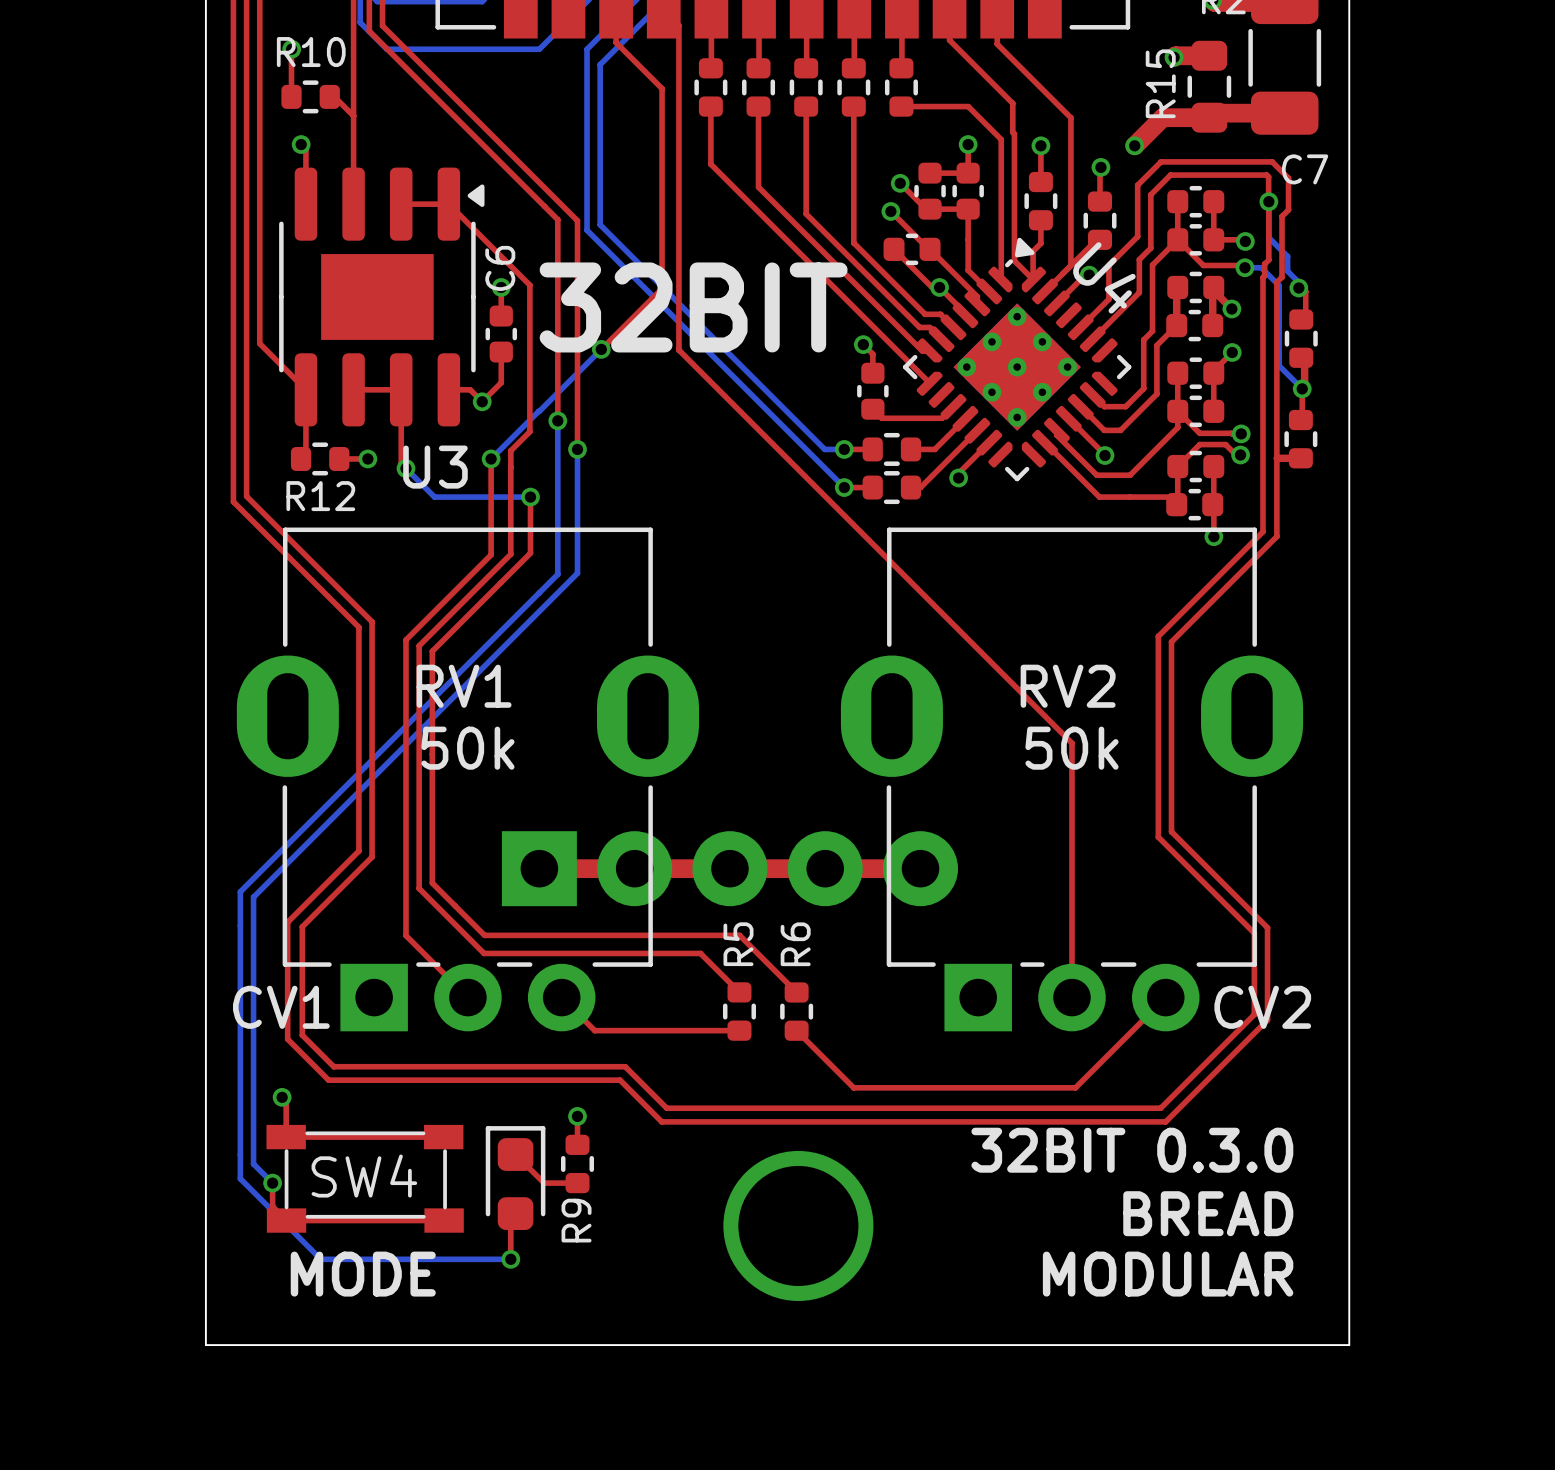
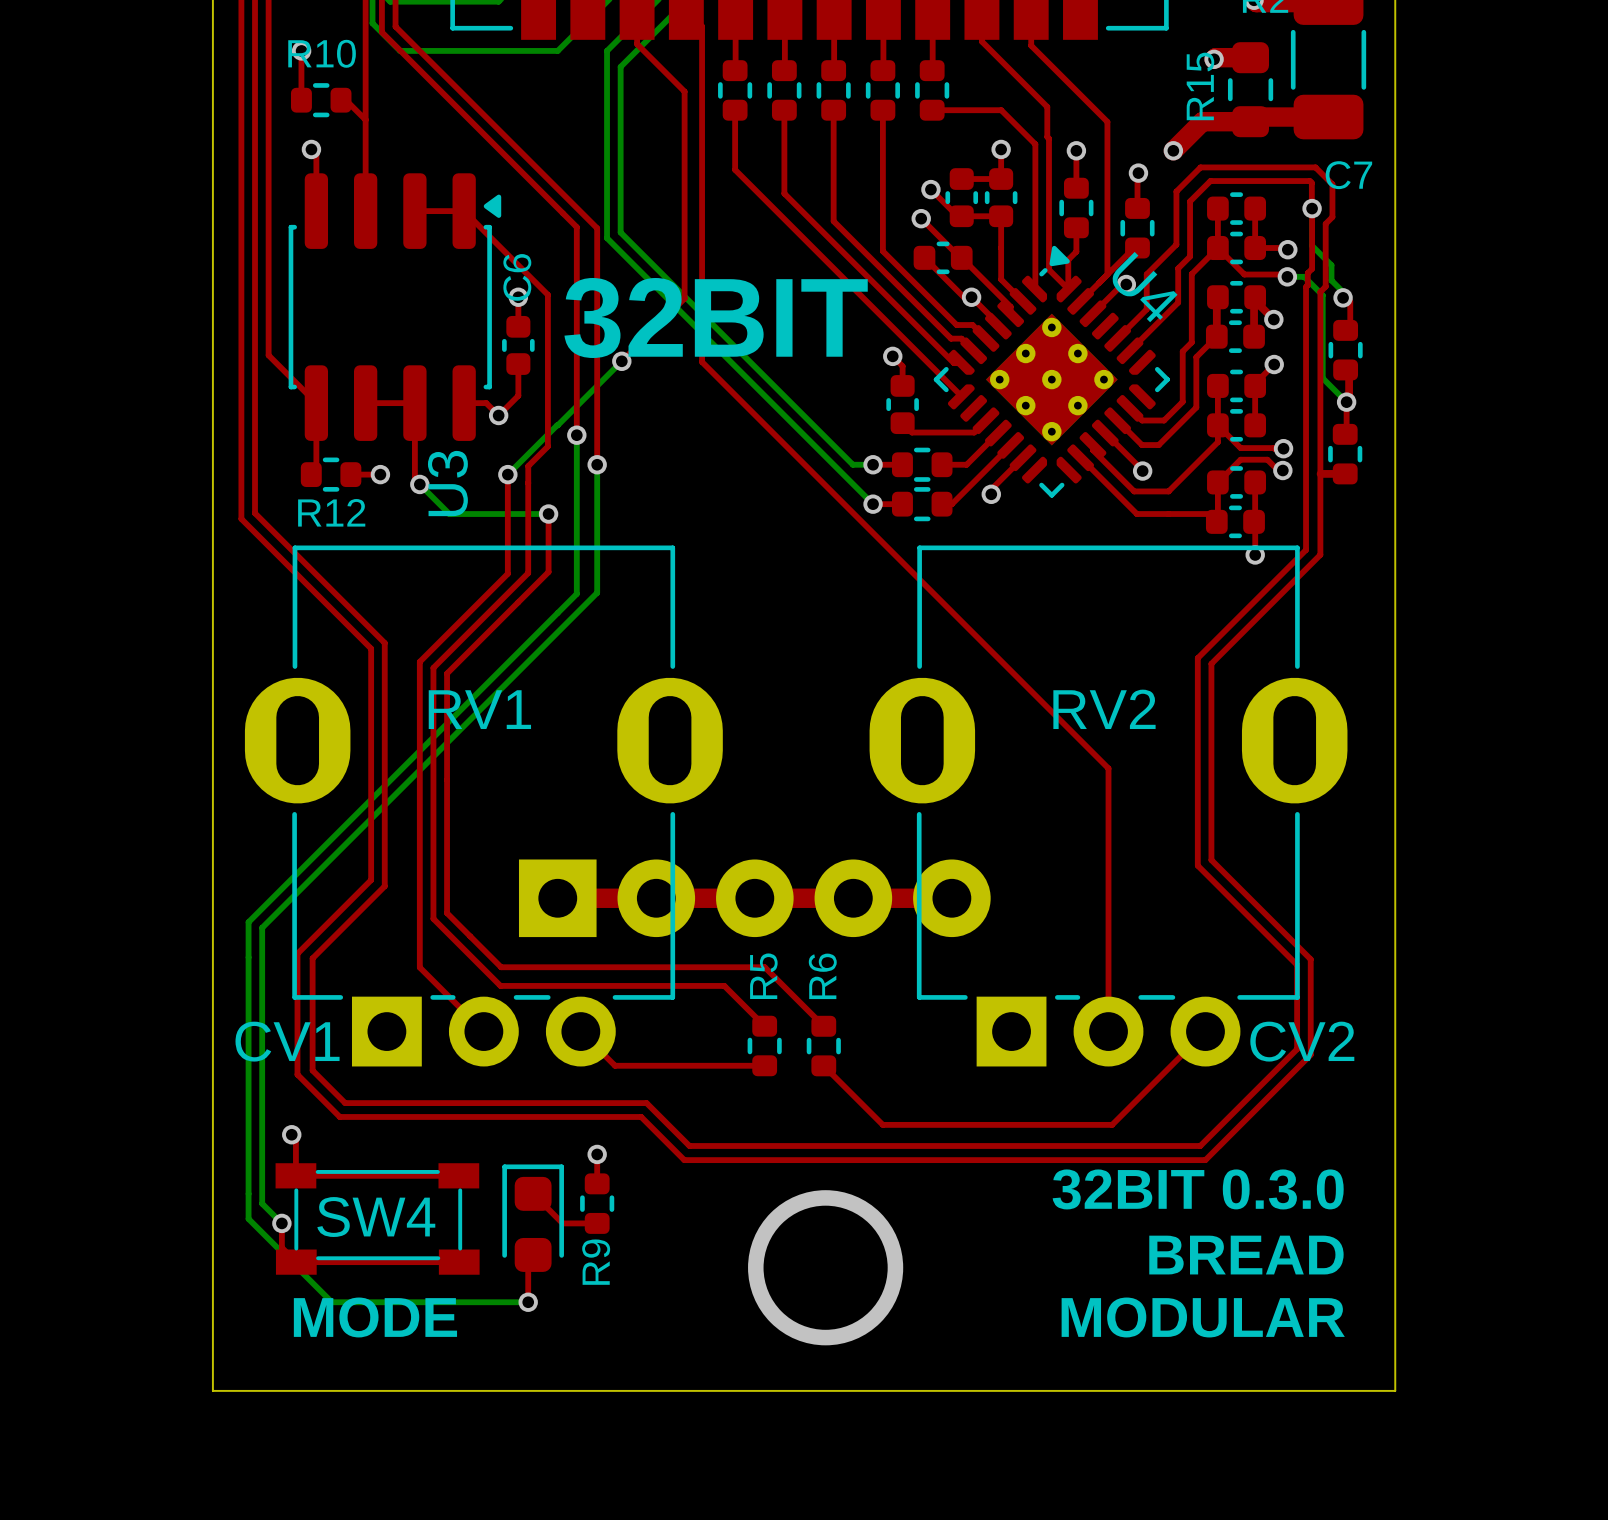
U3 footprint: [279, 167, 485, 427] -> [288, 173, 502, 441]
RV1 value: 50k (467, 748) -> none
RV2 value: 50k (1071, 748) -> none

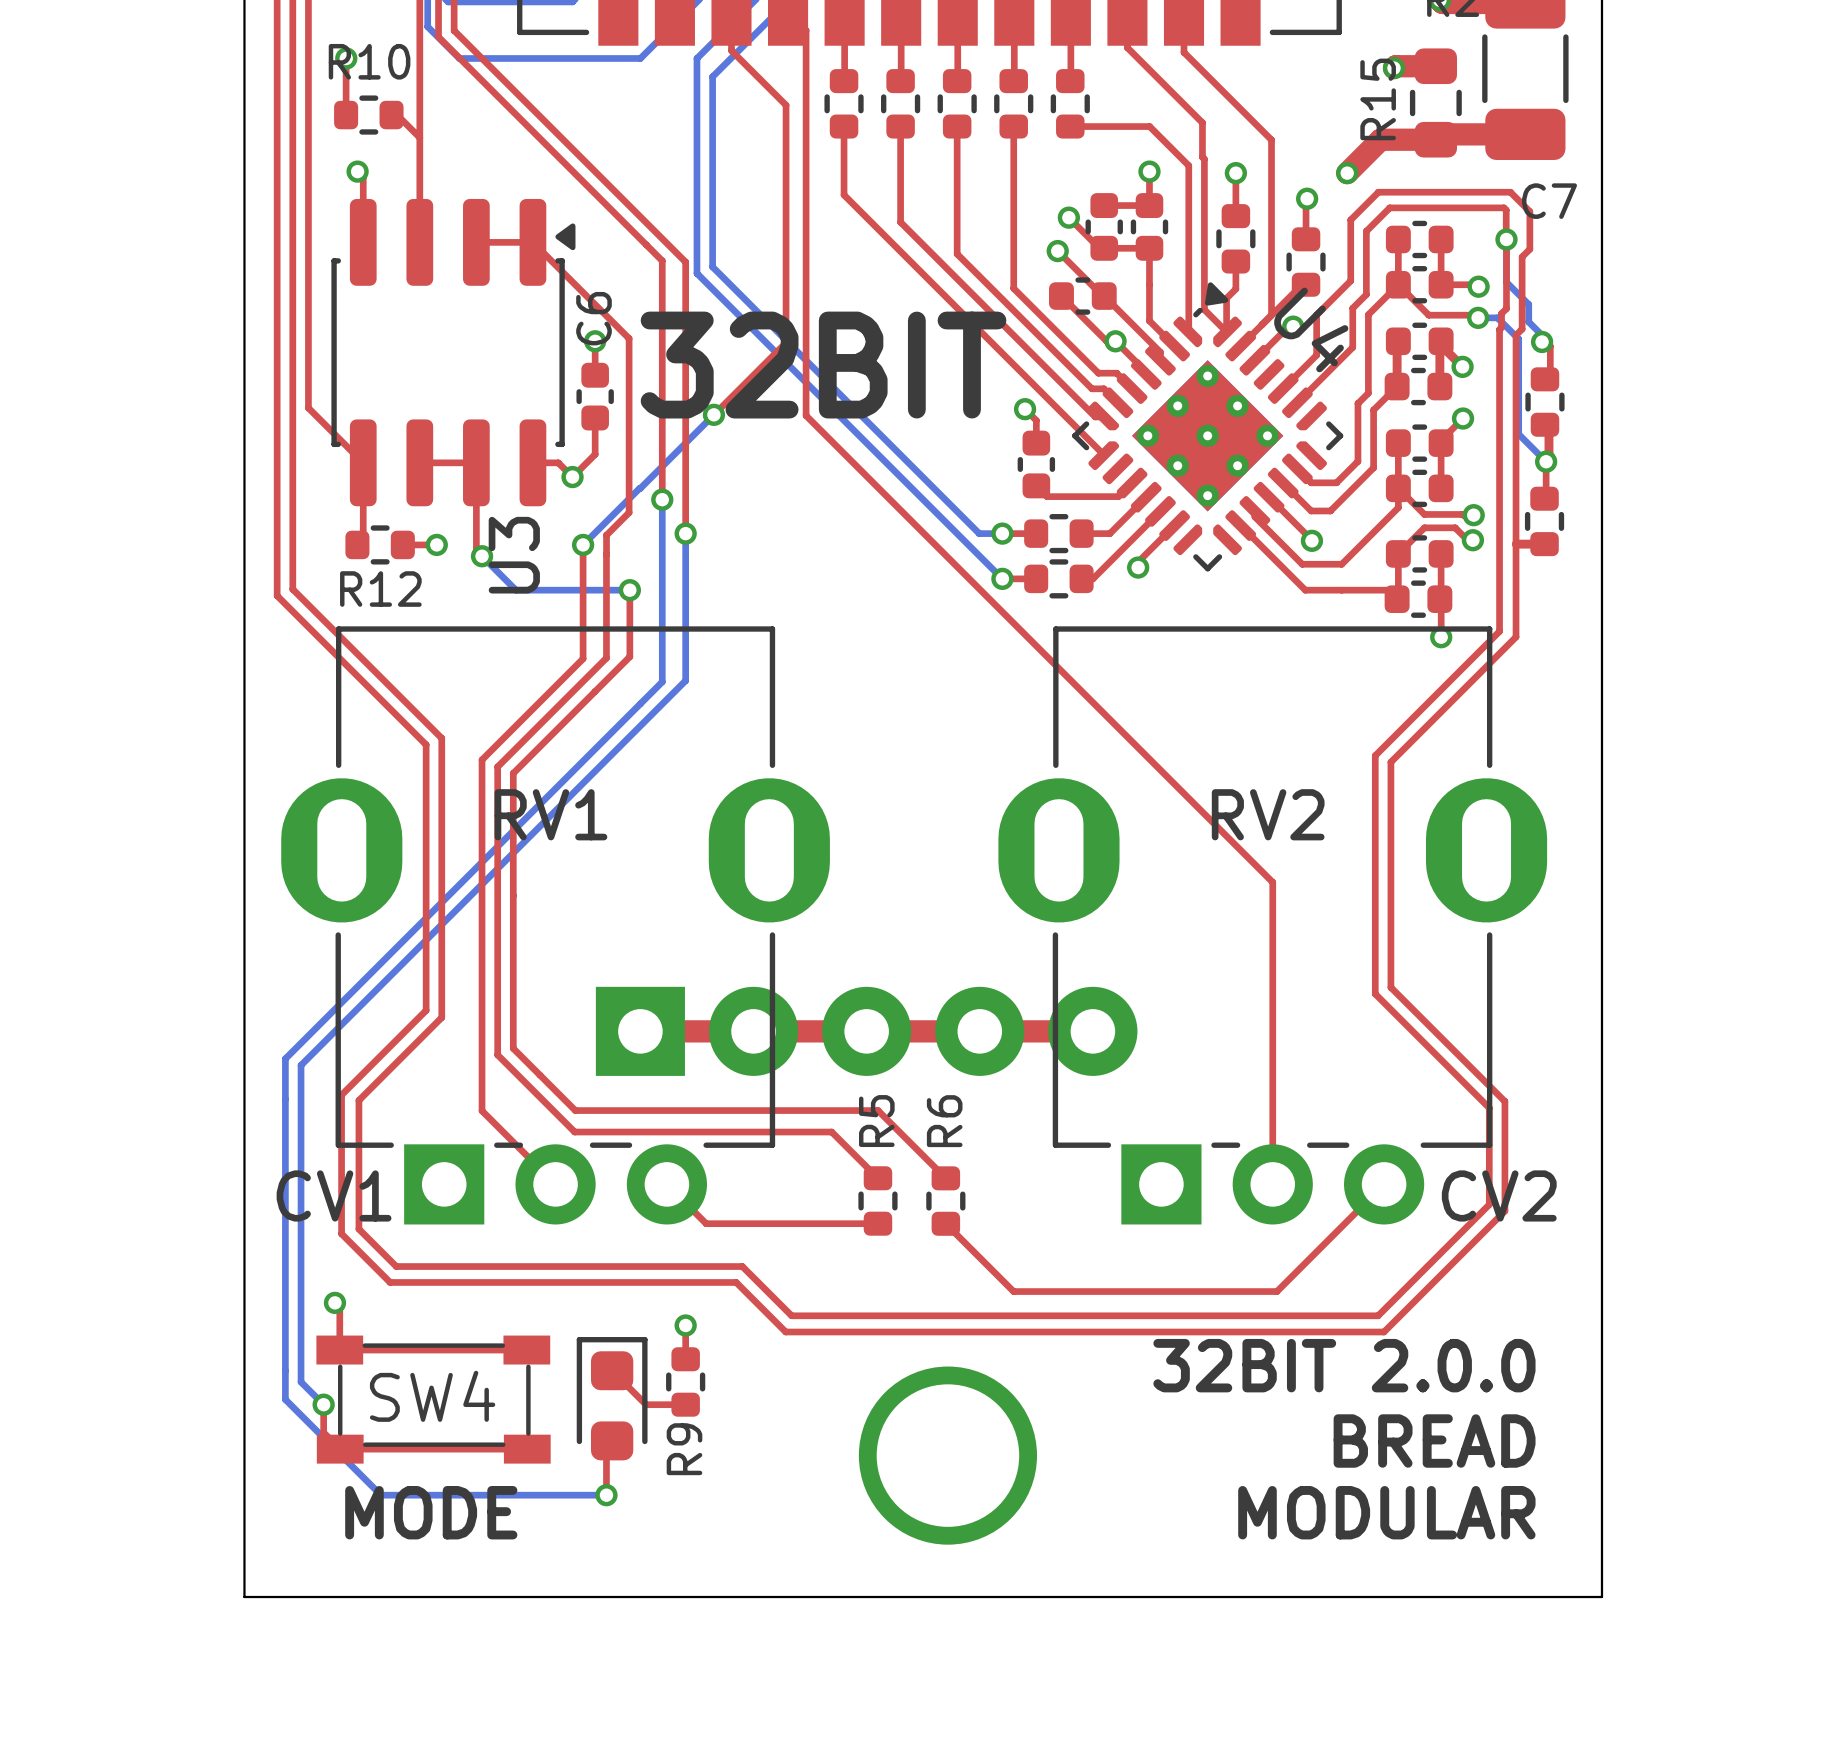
text: 32BIT 0.3.0 (1198, 1189) -> 32BIT 2.0.0 (1344, 1365)

